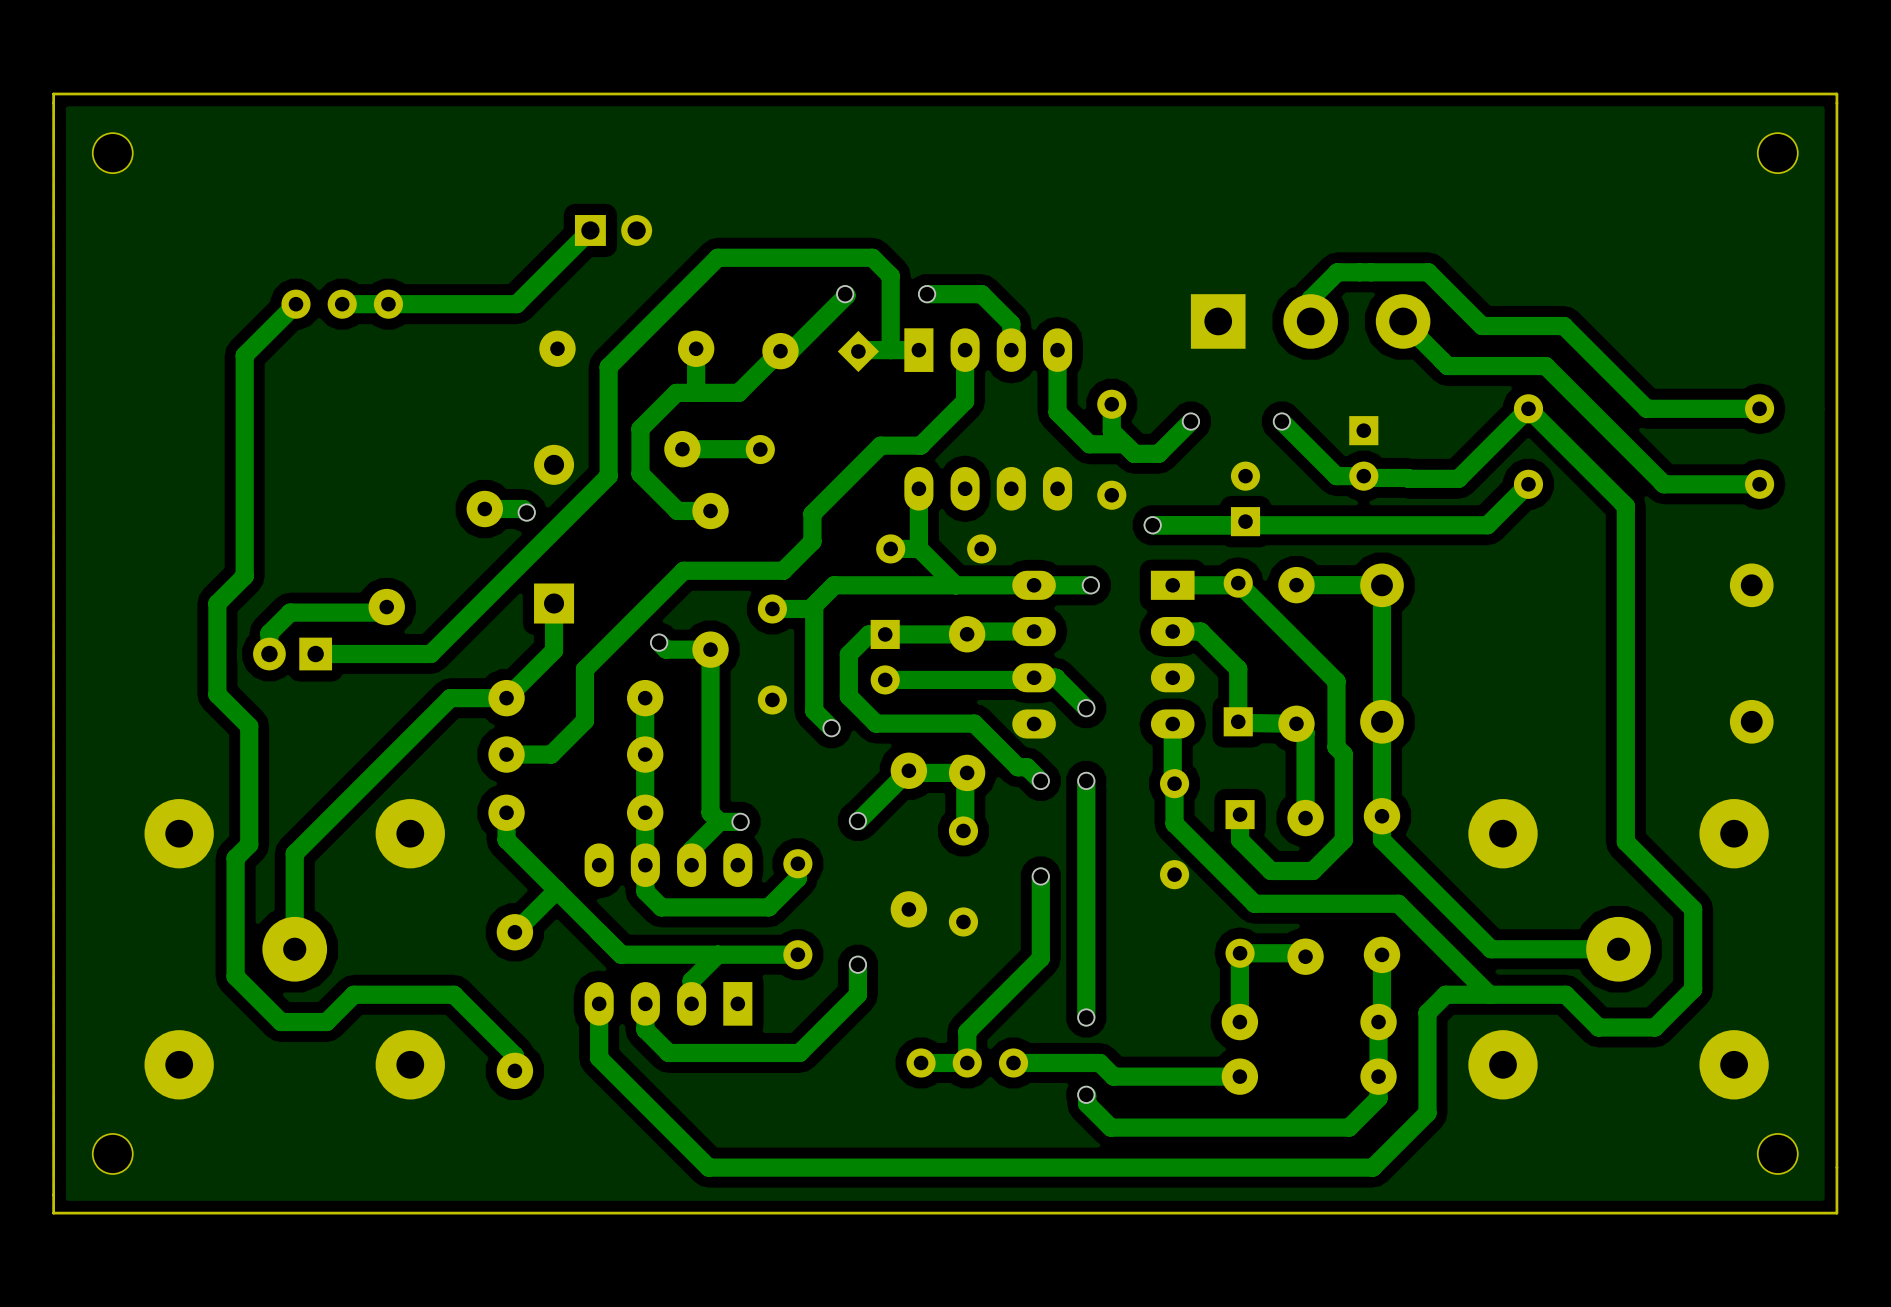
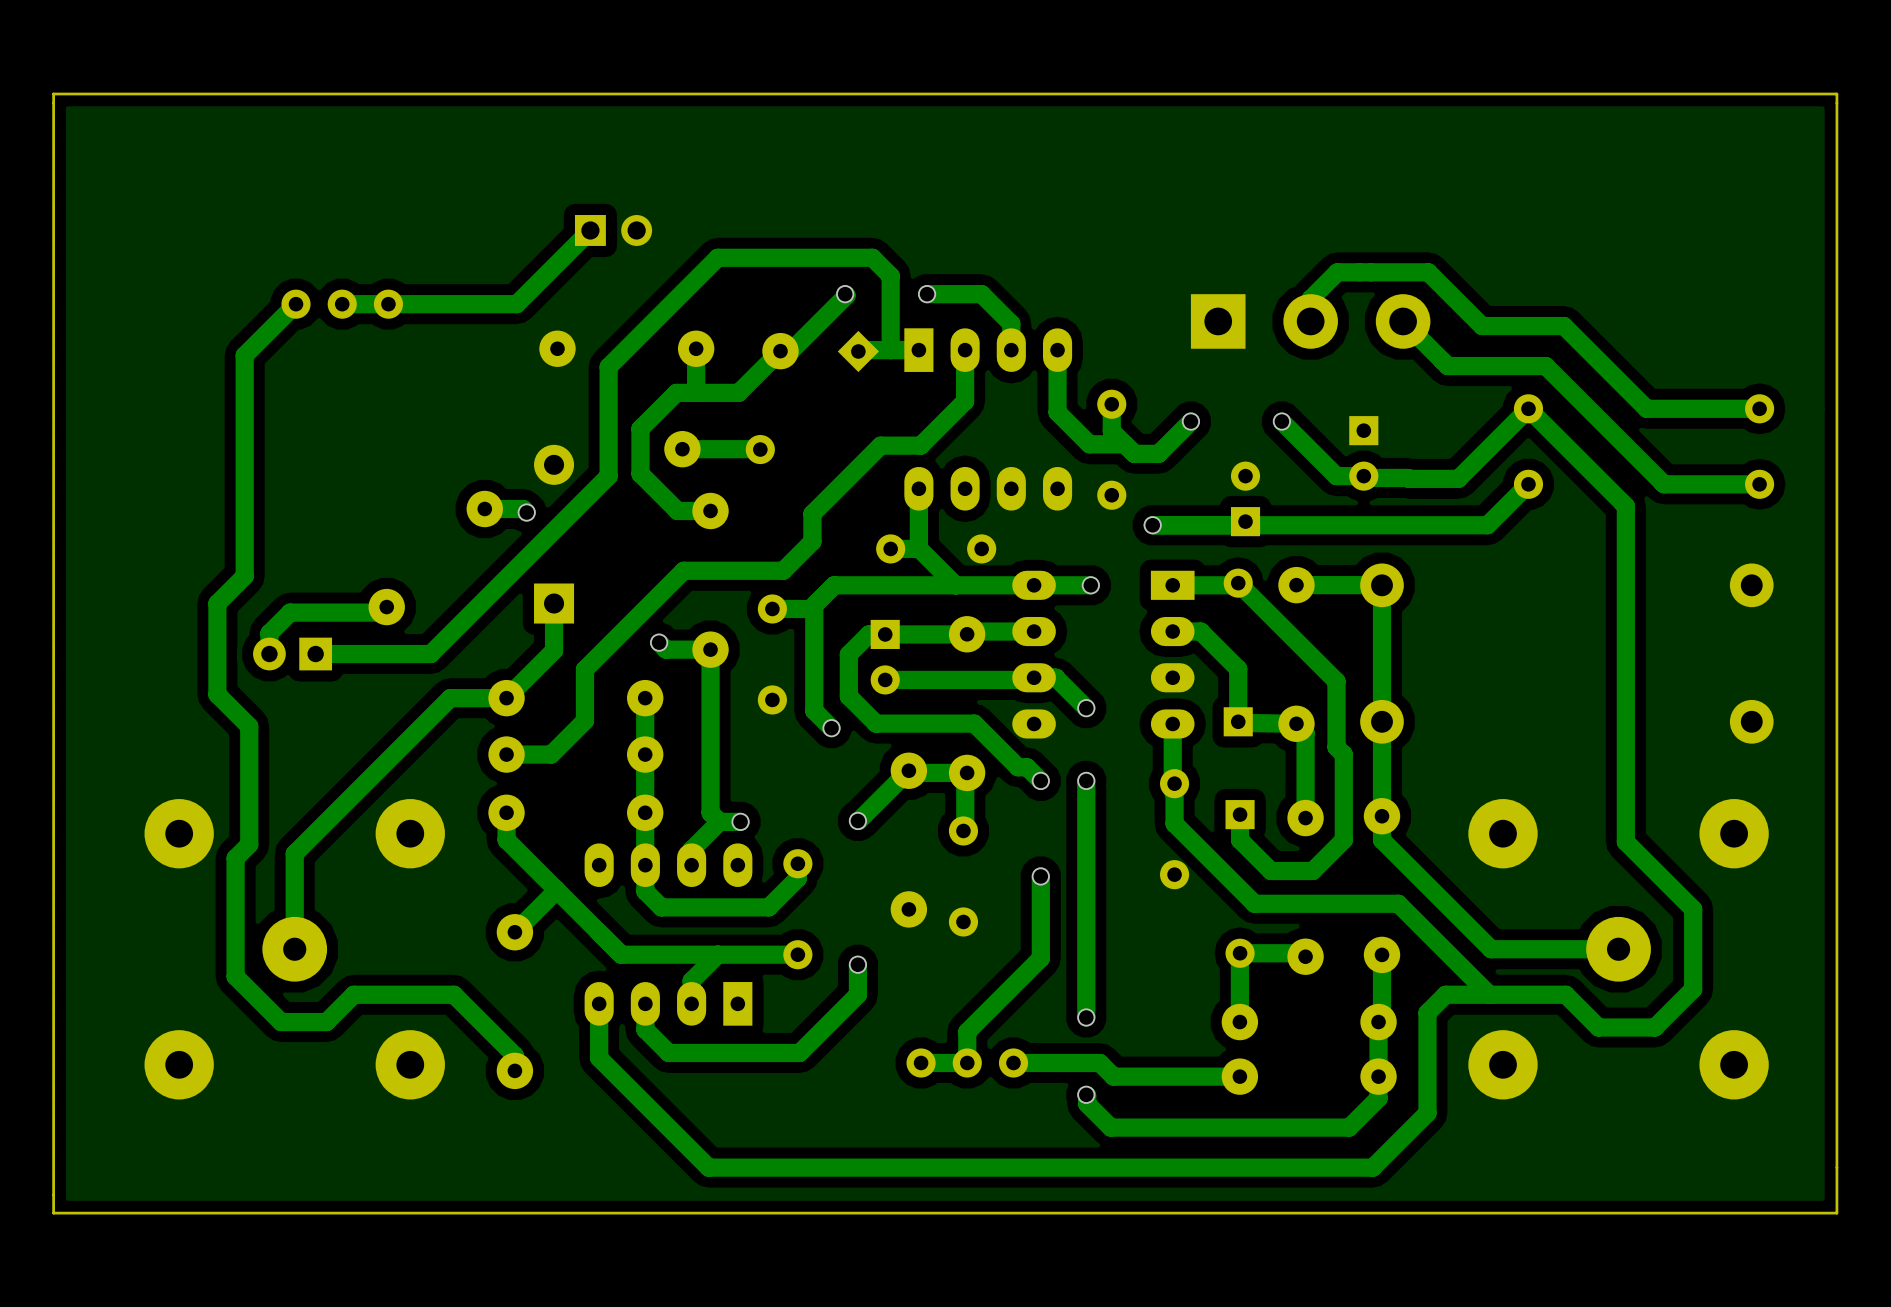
part: (112, 153) -> none
part: (1777, 153) -> none
part: (112, 1153) -> none
part: (1777, 1153) -> none

